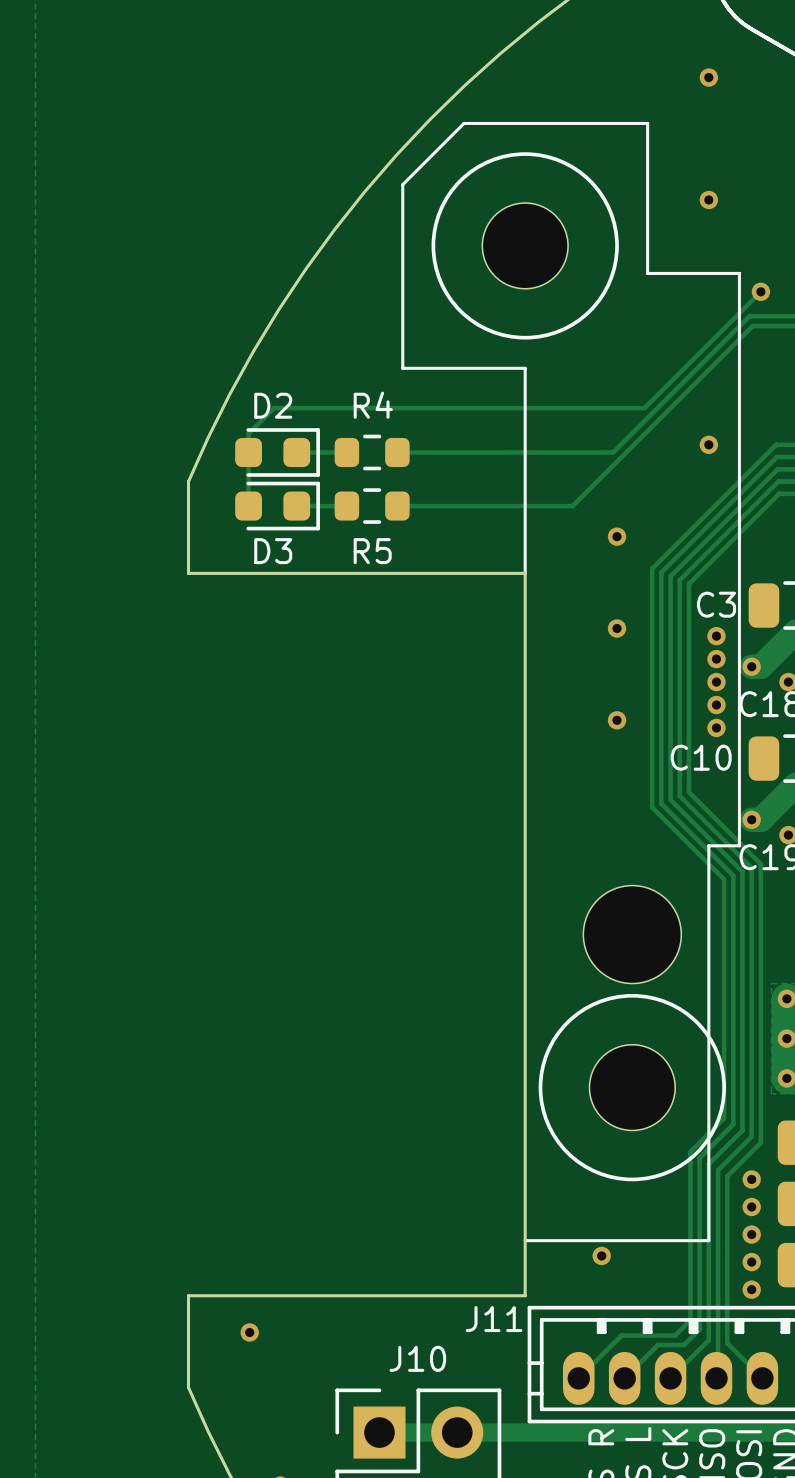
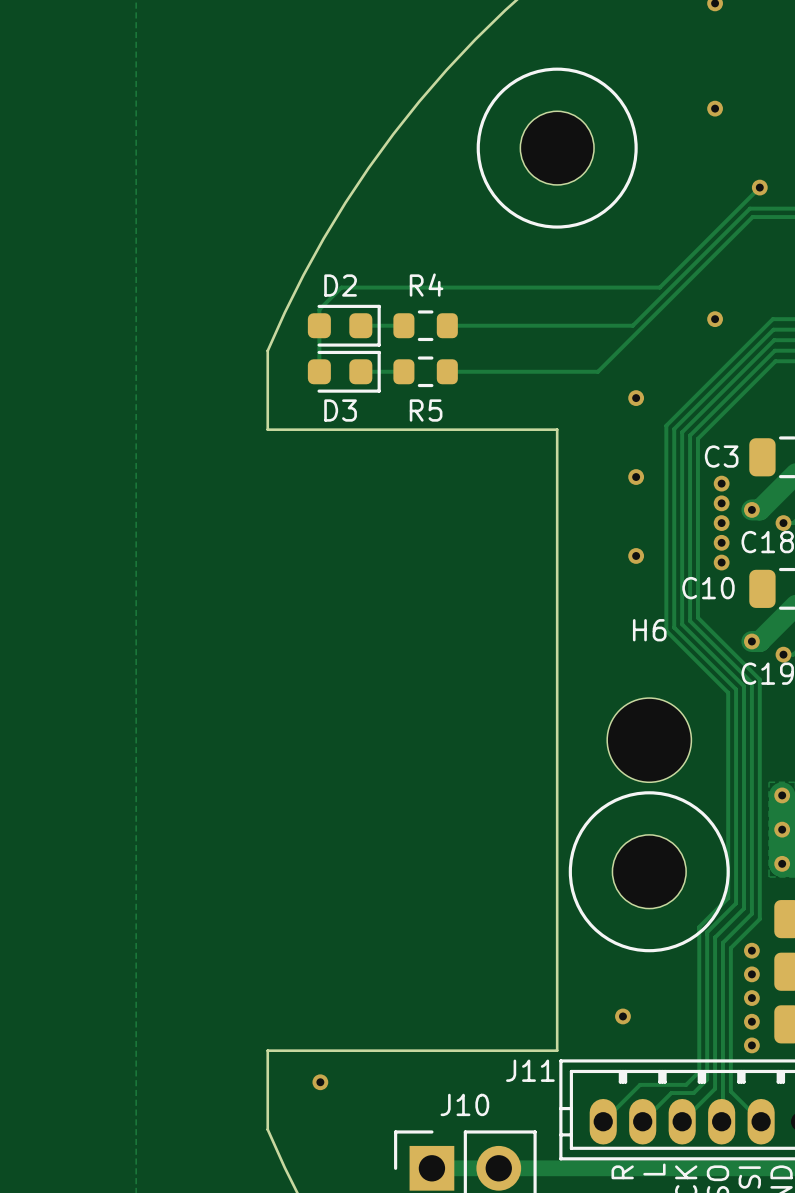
line: (525, 573) (525, 368) (402, 368) (402, 184) (463, 123) (647, 123) (647, 273) (739, 273) (739, 845) (708, 845) (708, 1240) (525, 1240) -> none
H6 name: none -> H6 (649, 630)

